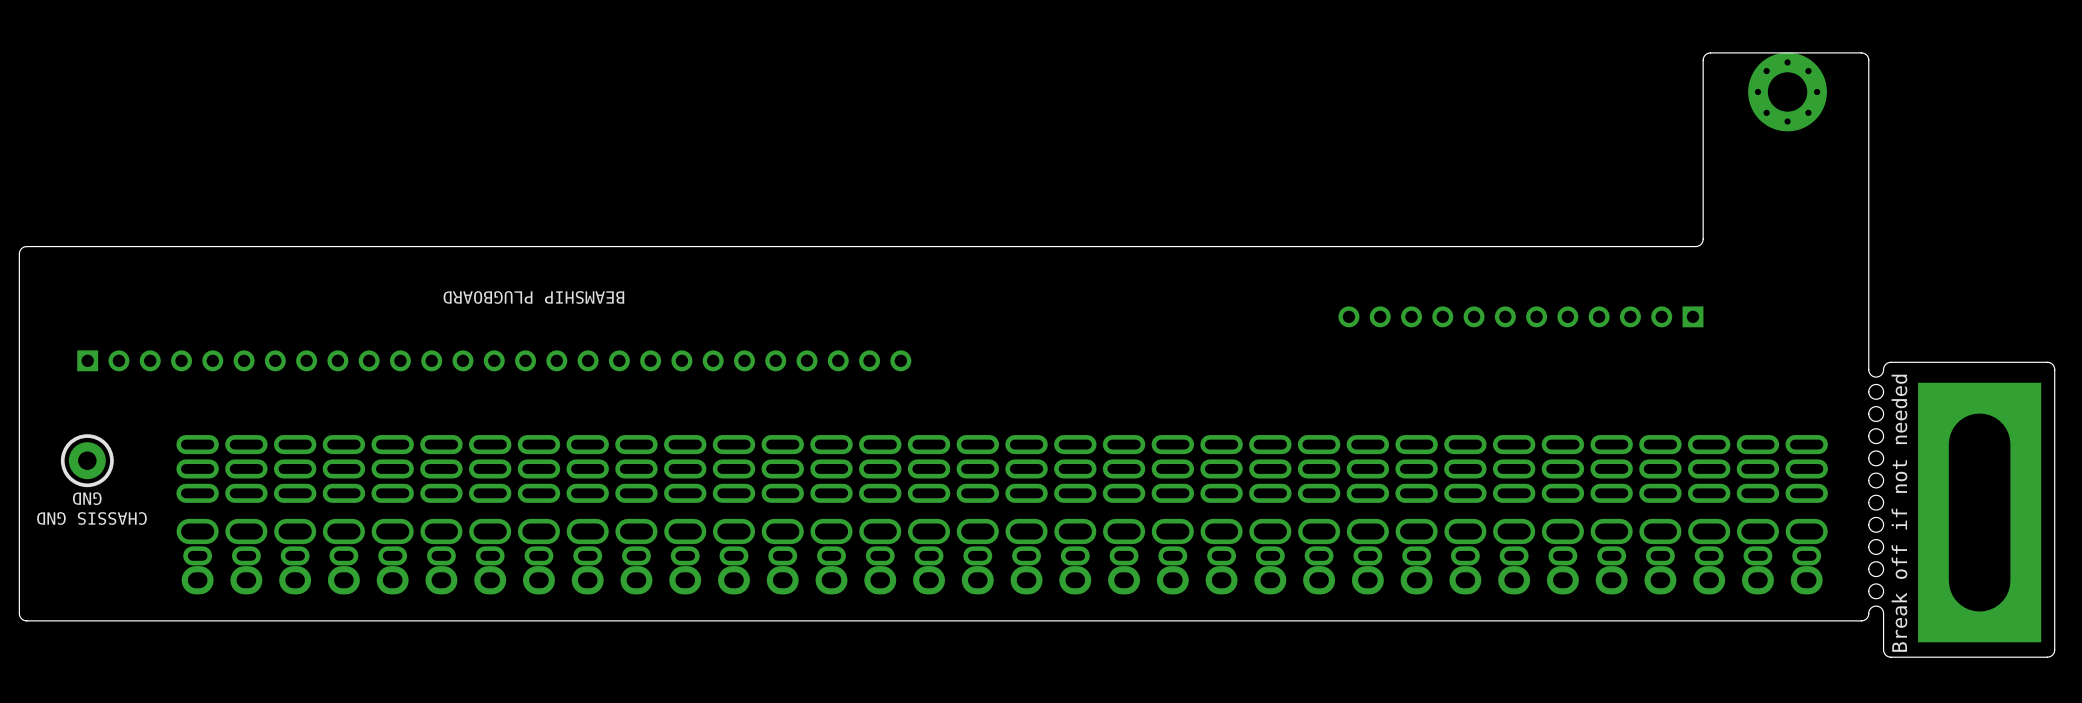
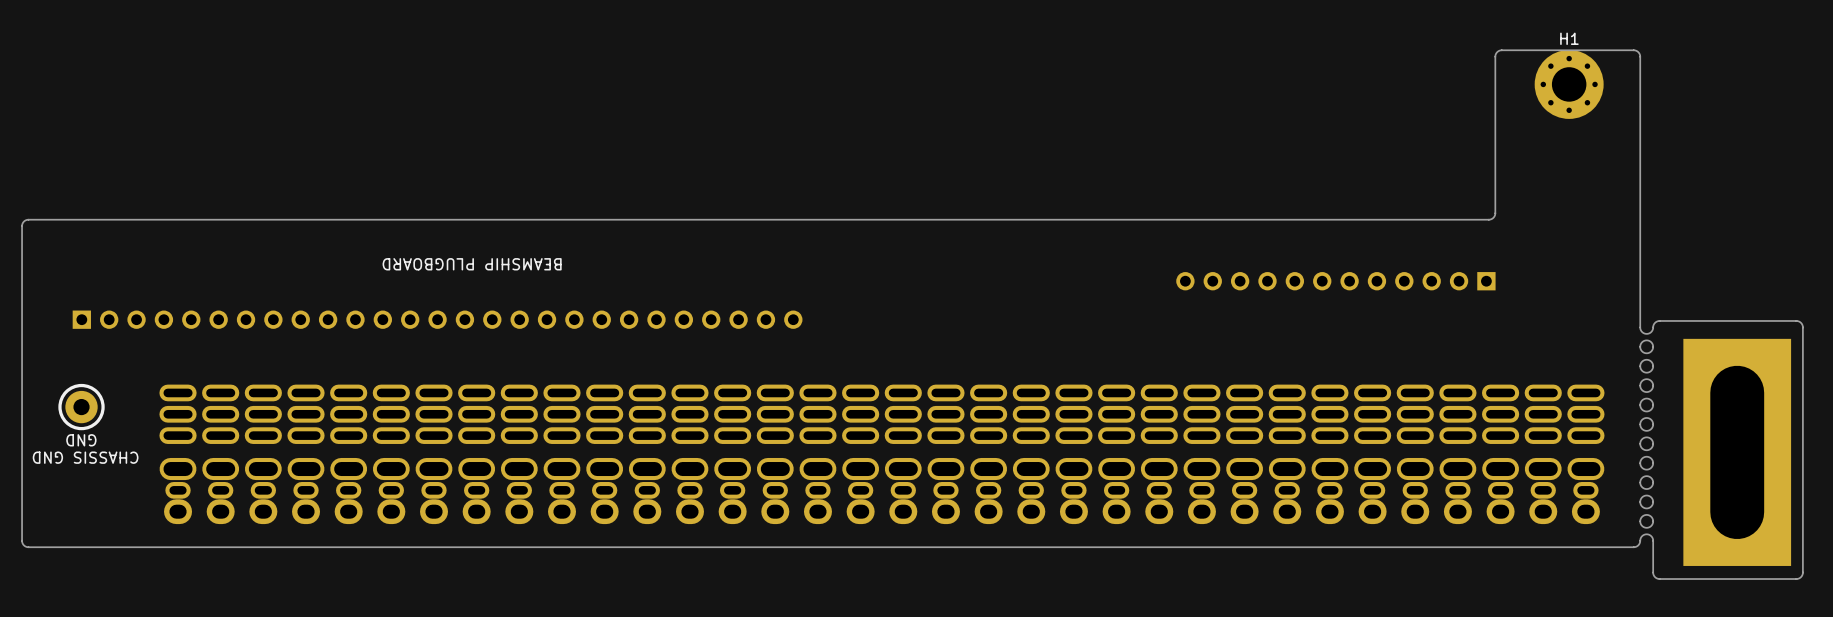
H1 name: none -> H1 (1569, 38)
text: Break off if not needed (1899, 513) -> none

